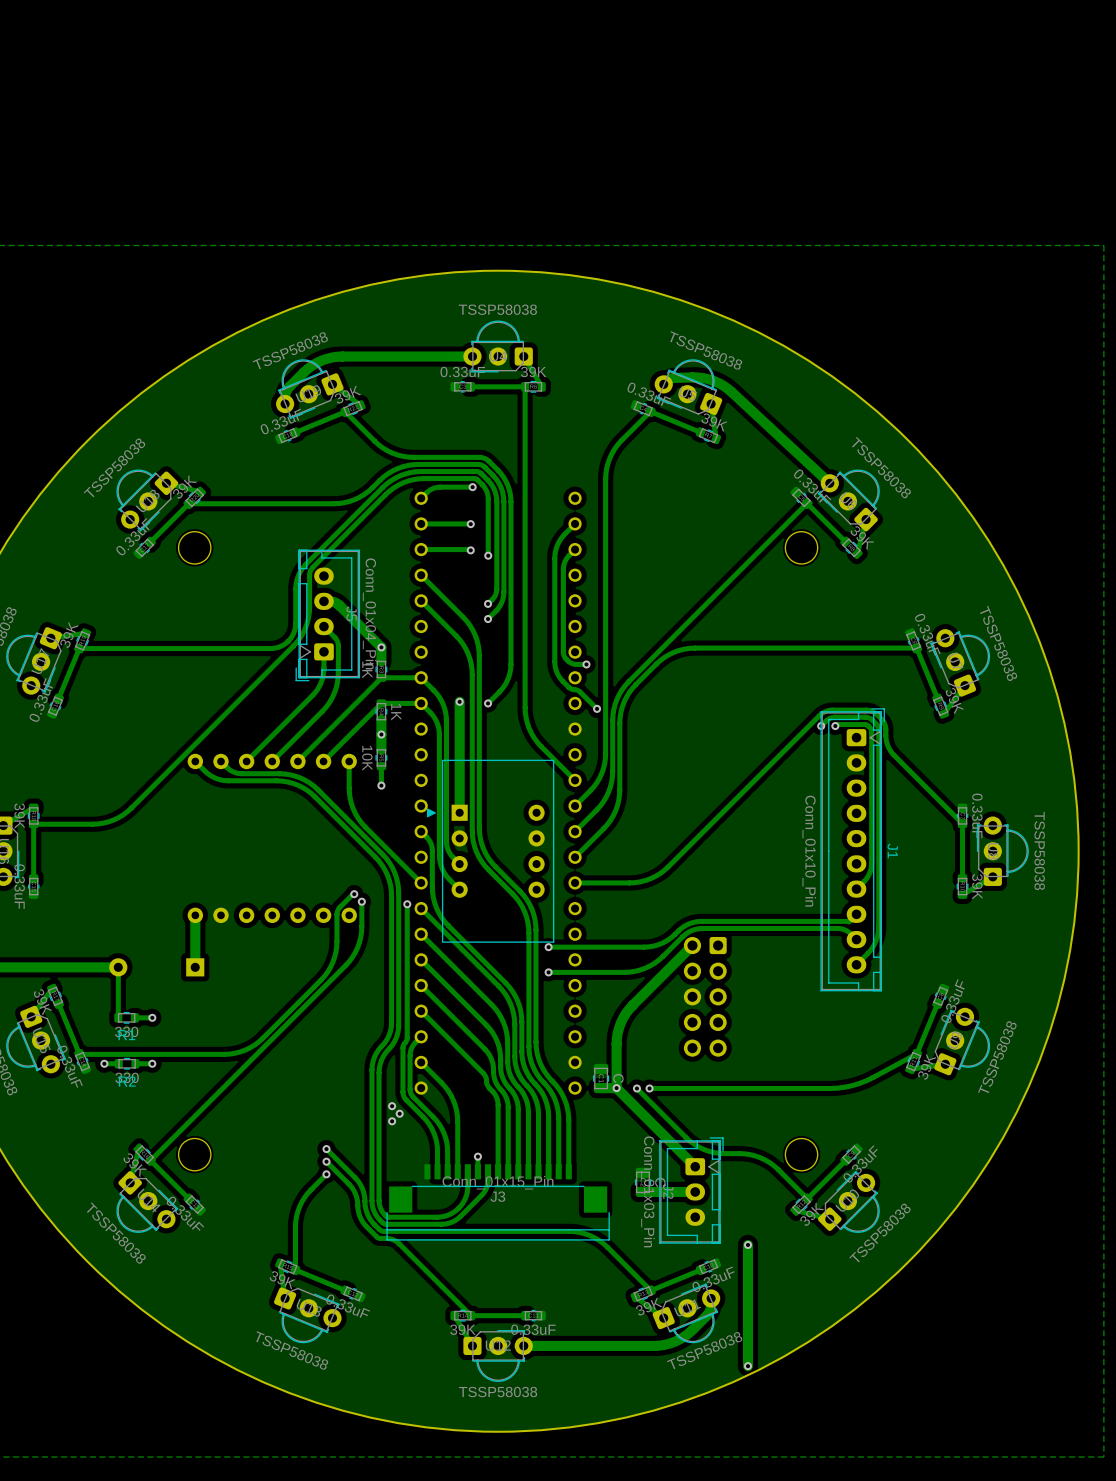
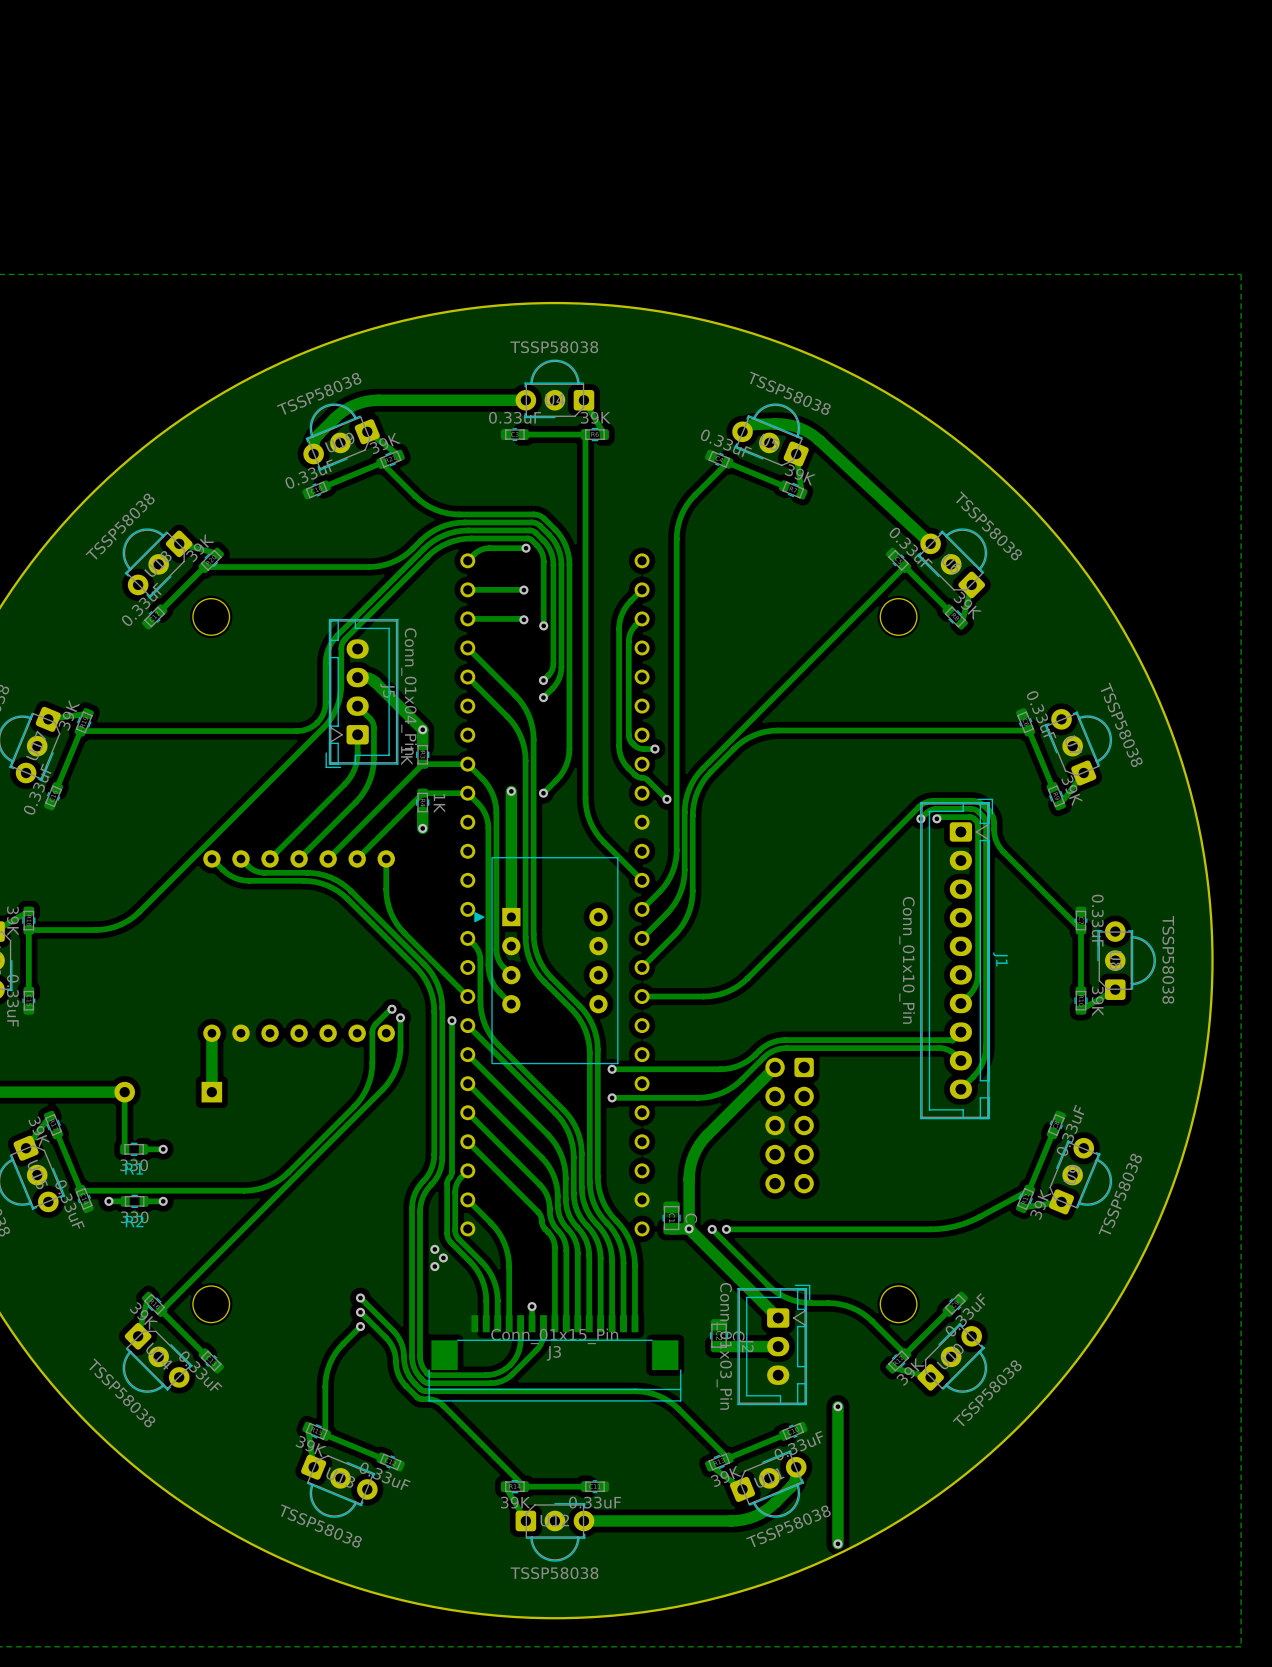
track: (381, 734) (381, 749) -> none
part: 10K (381, 757) -> none
track: (381, 766) (381, 785) -> none
via: (381, 785) -> none

